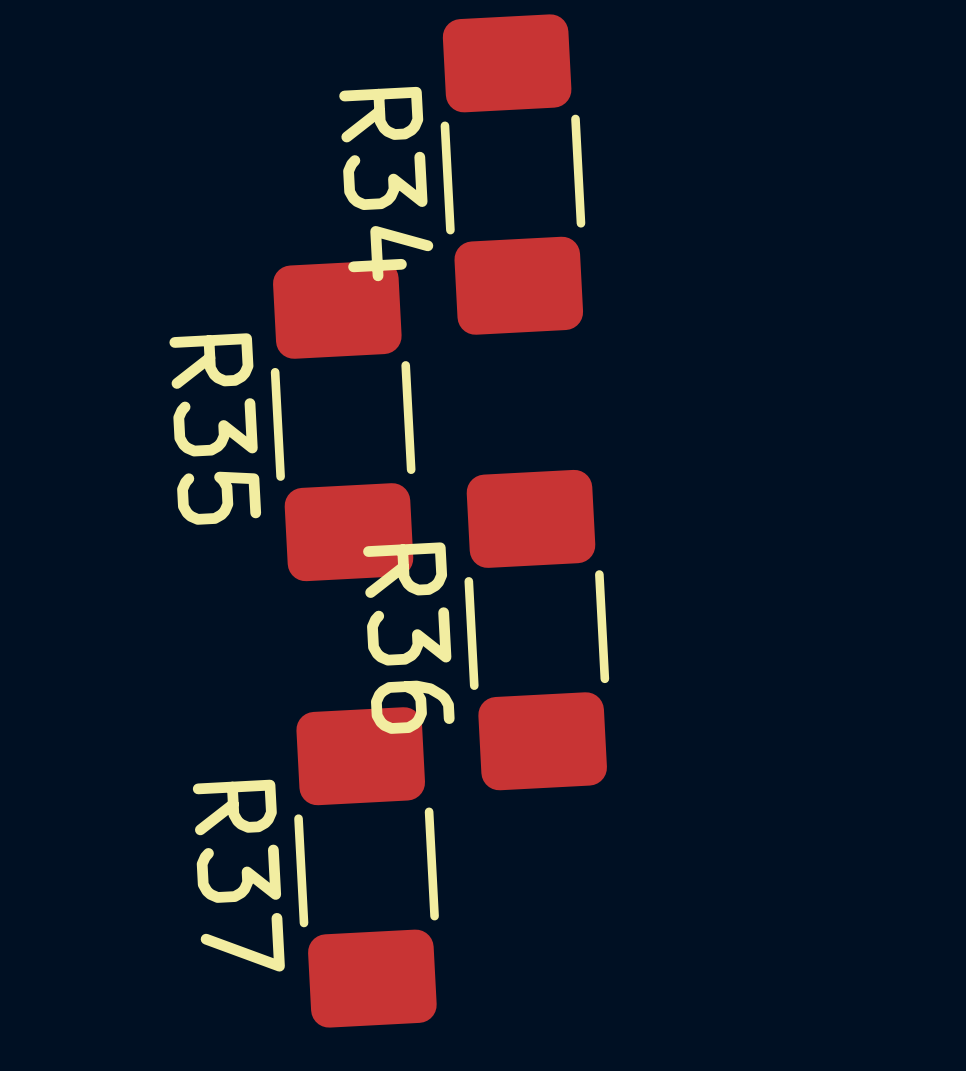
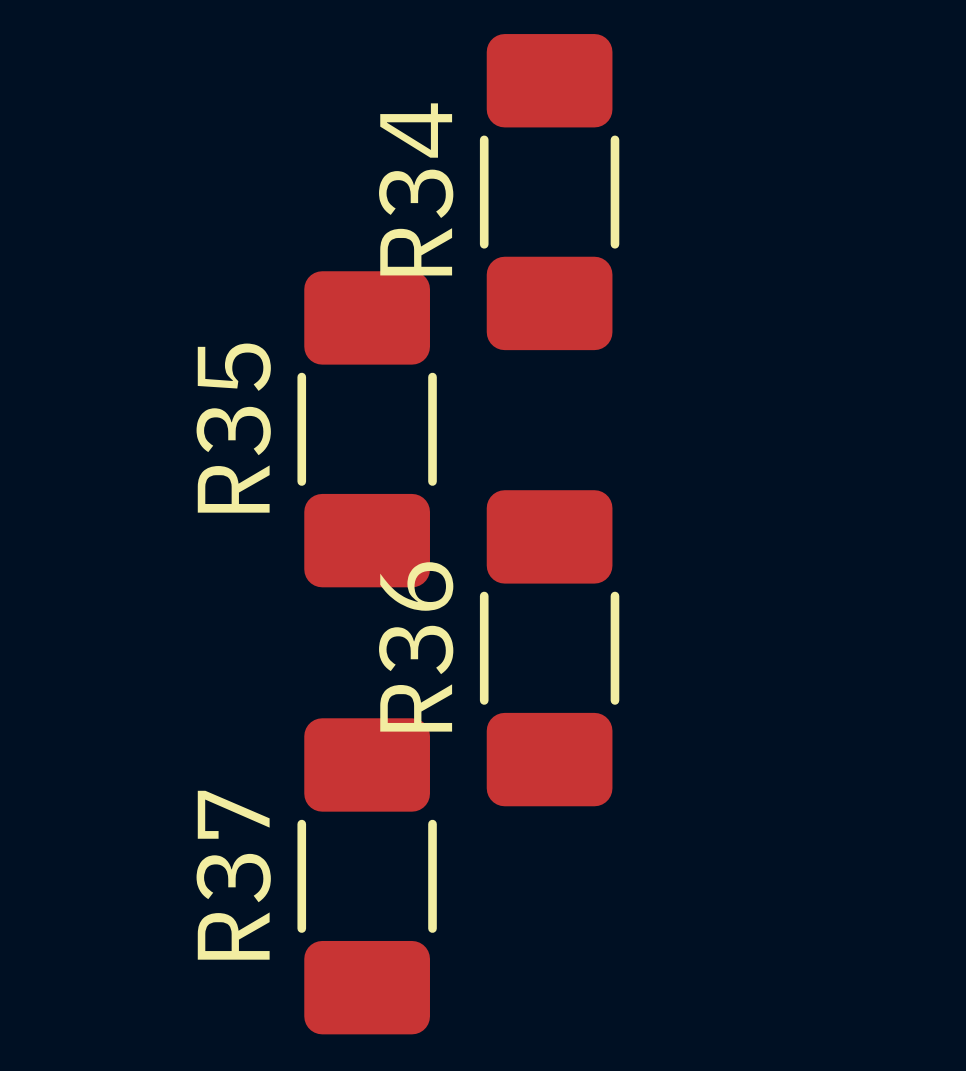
R34 rotation: 0° (512, 174) -> 3° clockwise (549, 192)
R35 rotation: 0° (343, 420) -> 3° clockwise (367, 429)
R36 rotation: 0° (536, 630) -> 3° clockwise (549, 648)
R37 rotation: 0° (366, 867) -> 3° clockwise (367, 876)

